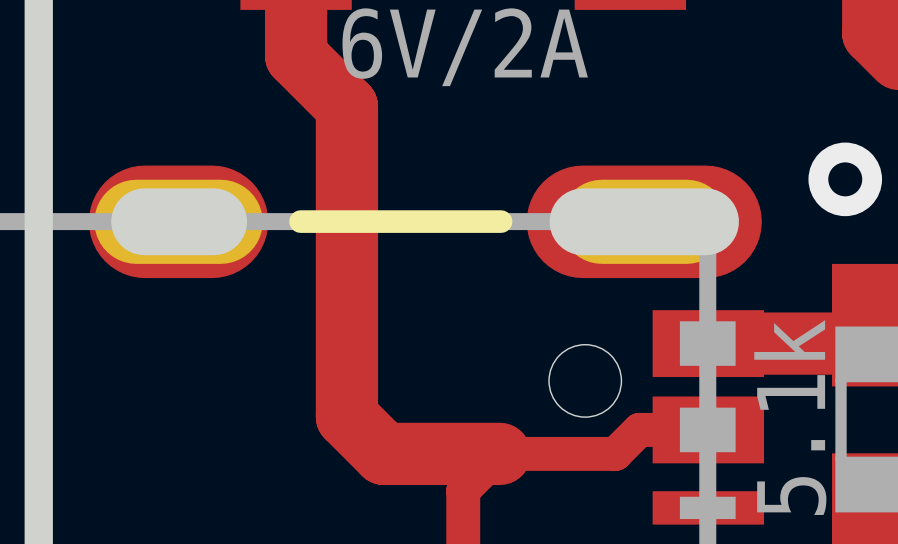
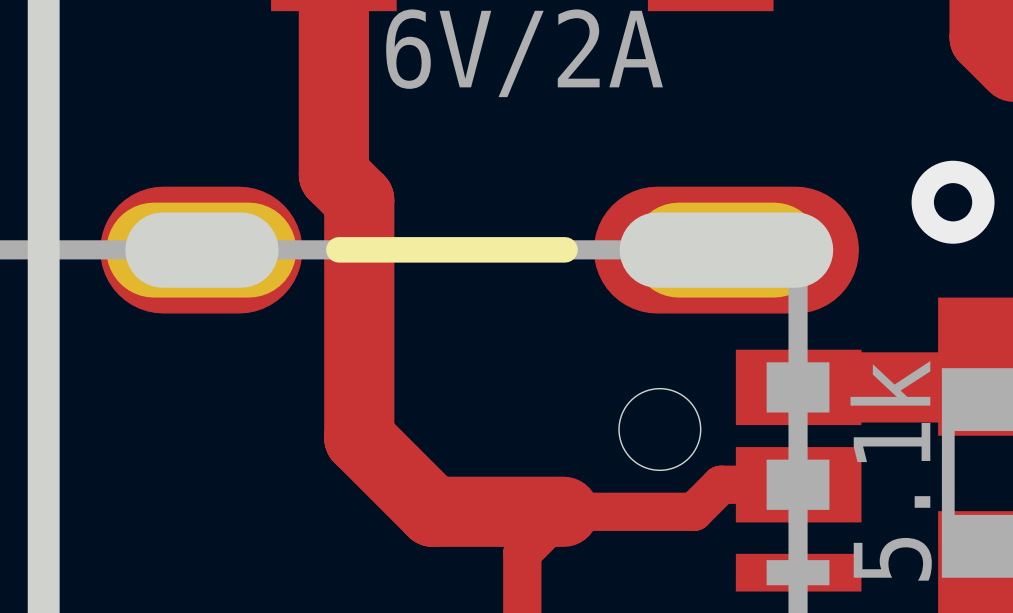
track: (296, 55) (346, 106) (346, 416) -> (333, 62) (333, 174) (359, 200) (359, 438) (391, 469)

